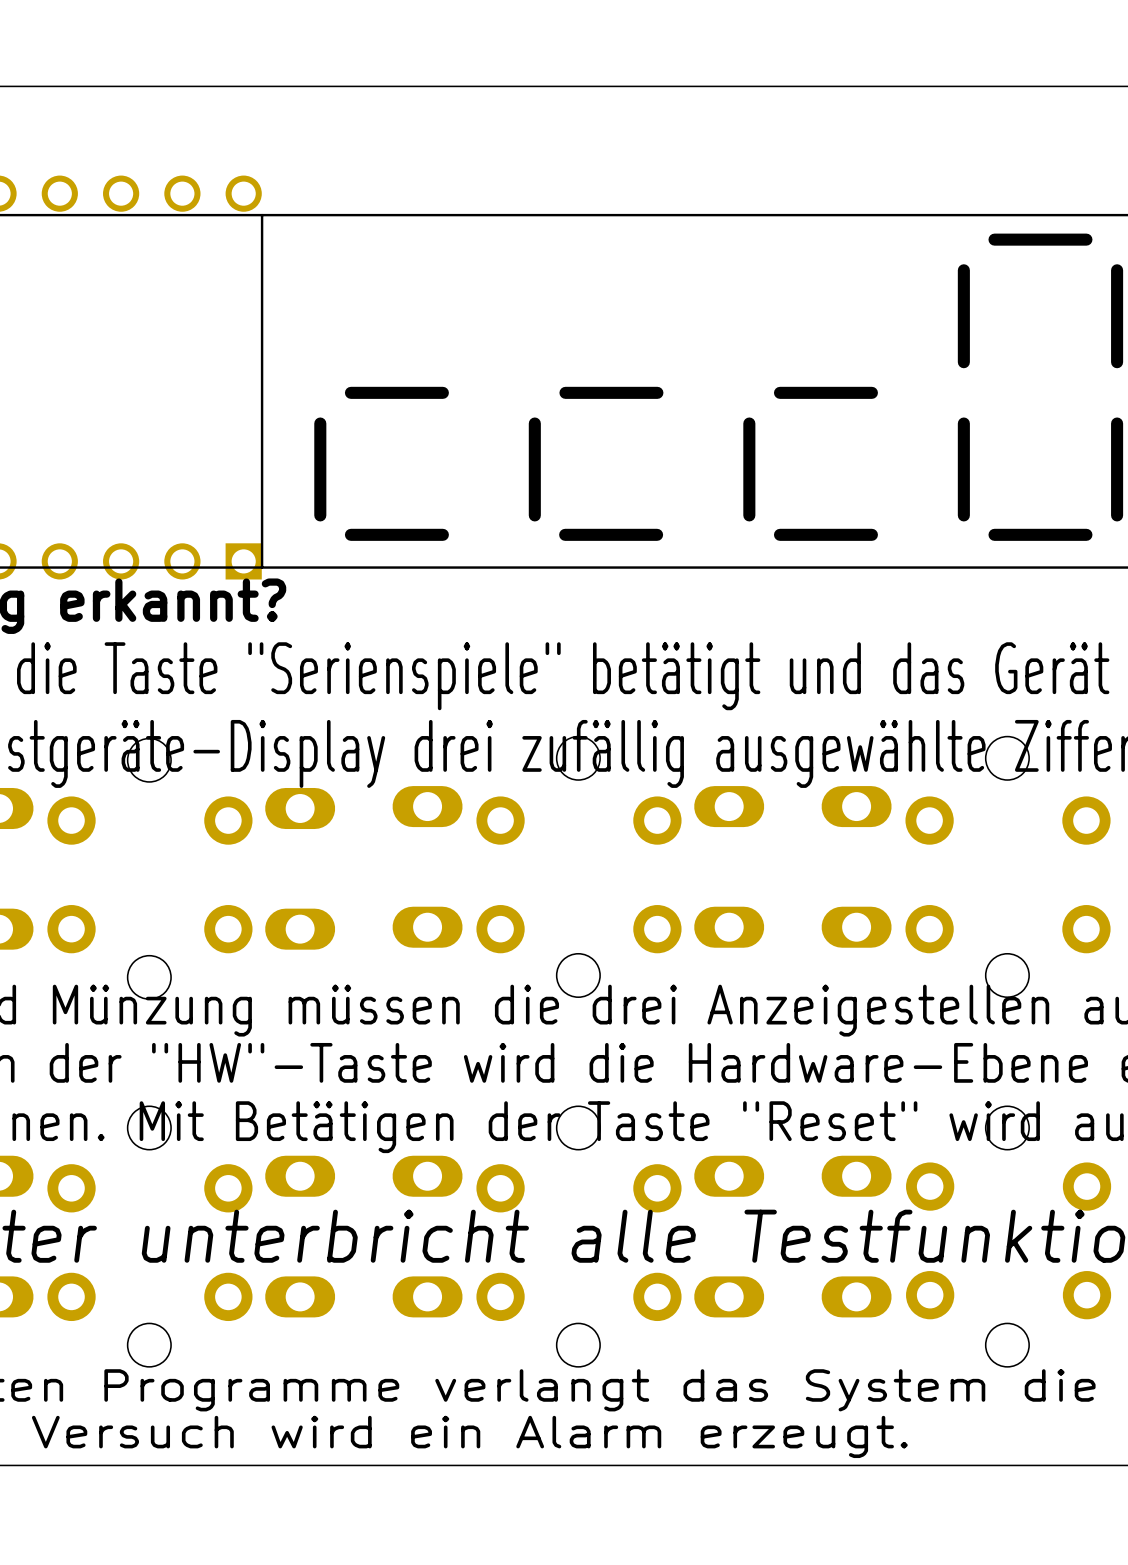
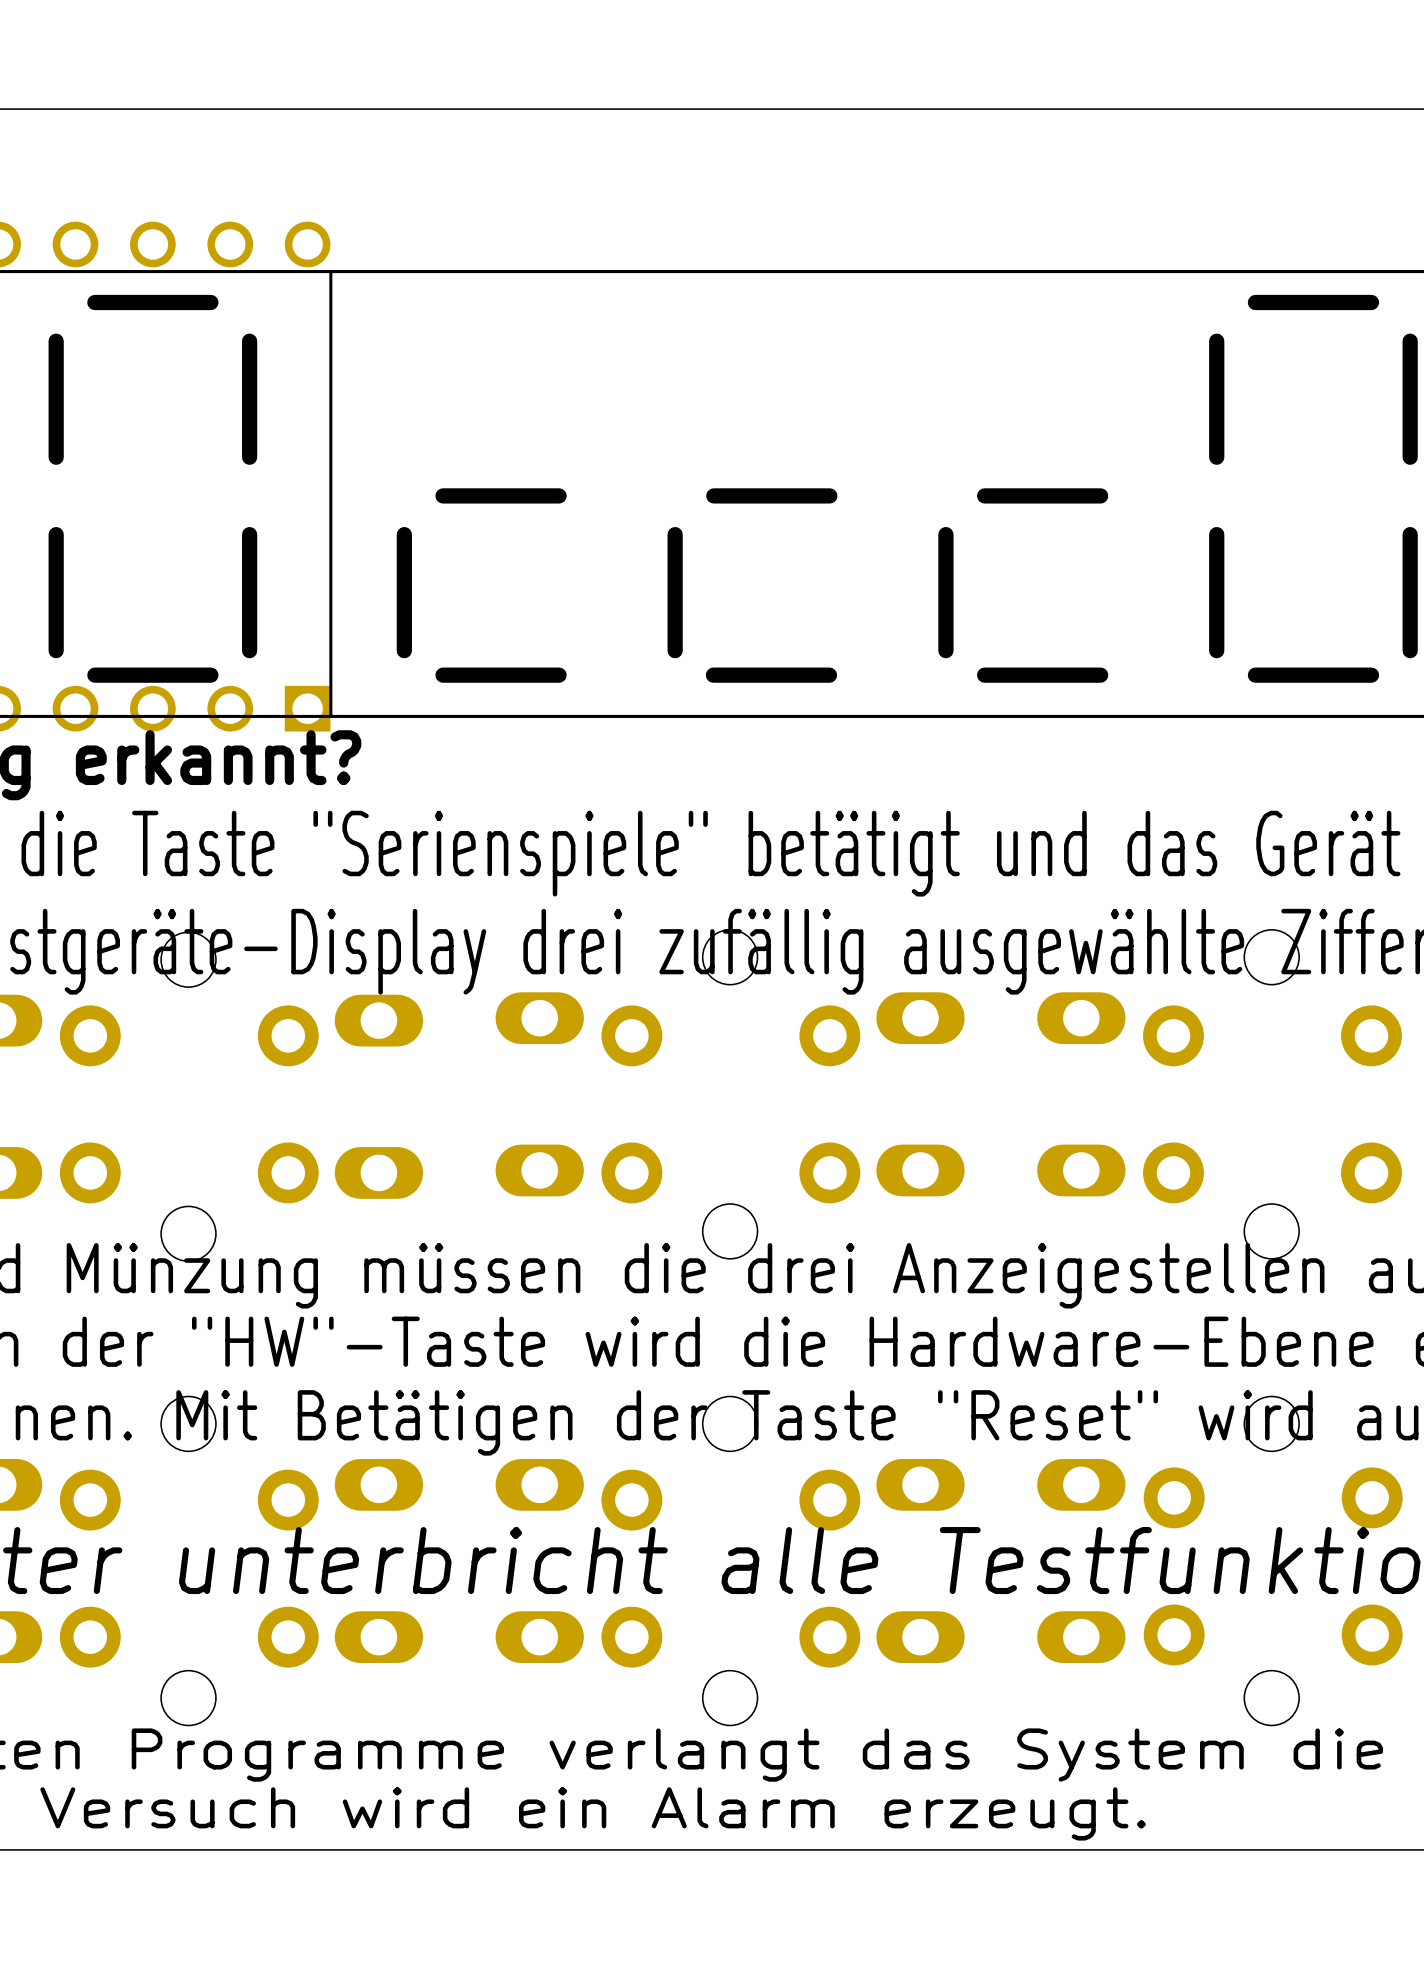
line: none -> (210, 302) (94, 302)
line: none -> (56, 341) (56, 457)
line: none -> (249, 341) (249, 457)
line: none -> (56, 534) (56, 650)
line: none -> (249, 534) (249, 650)
line: none -> (210, 675) (94, 675)

